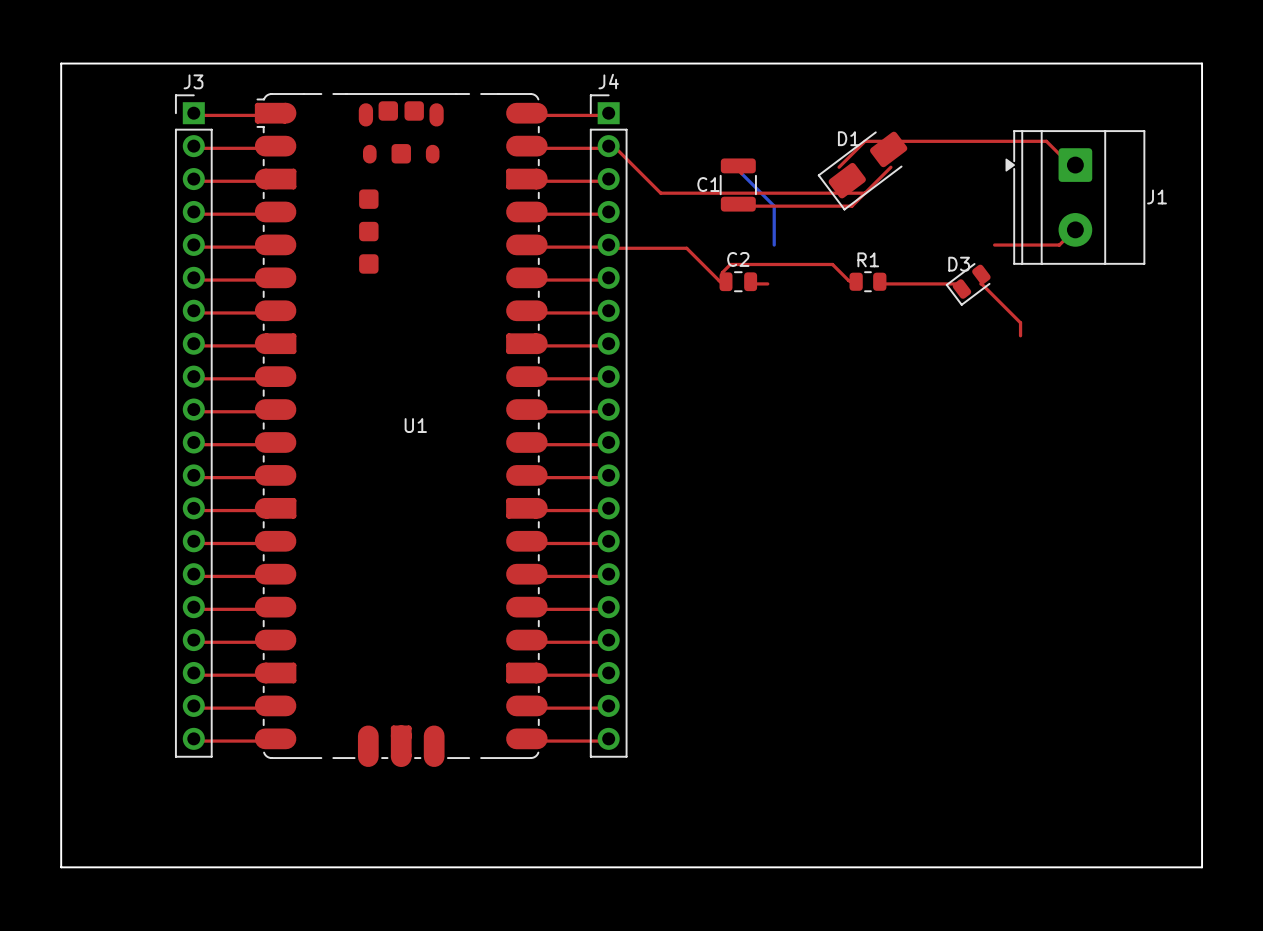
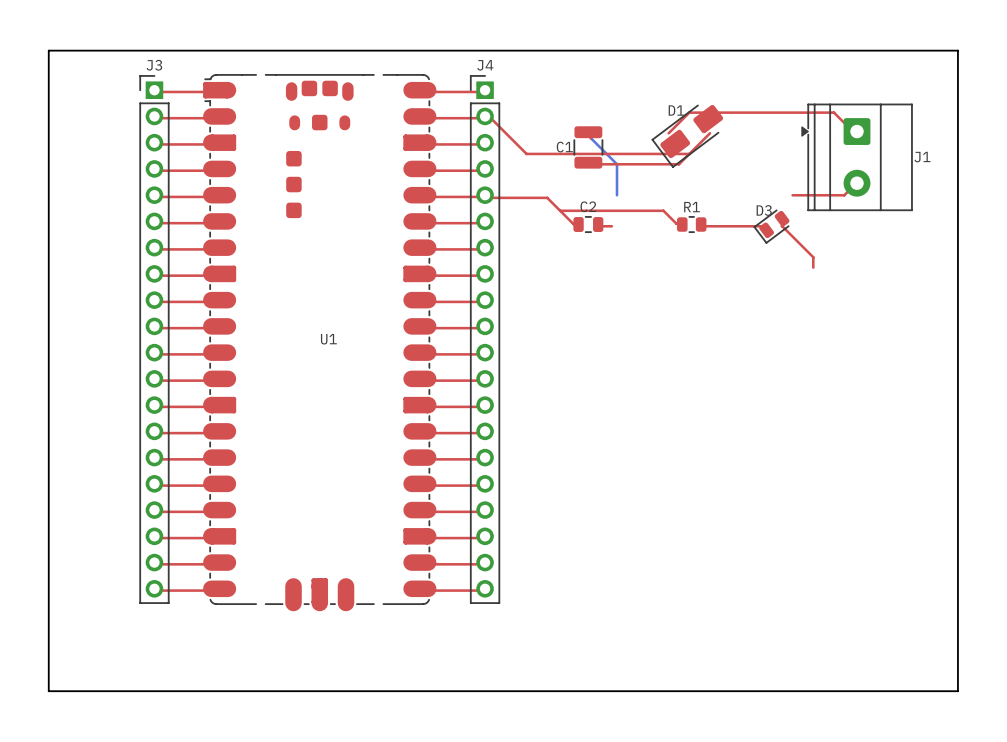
top track: (730, 264) (722, 272) (723, 283) -> (582, 210) (560, 210)

